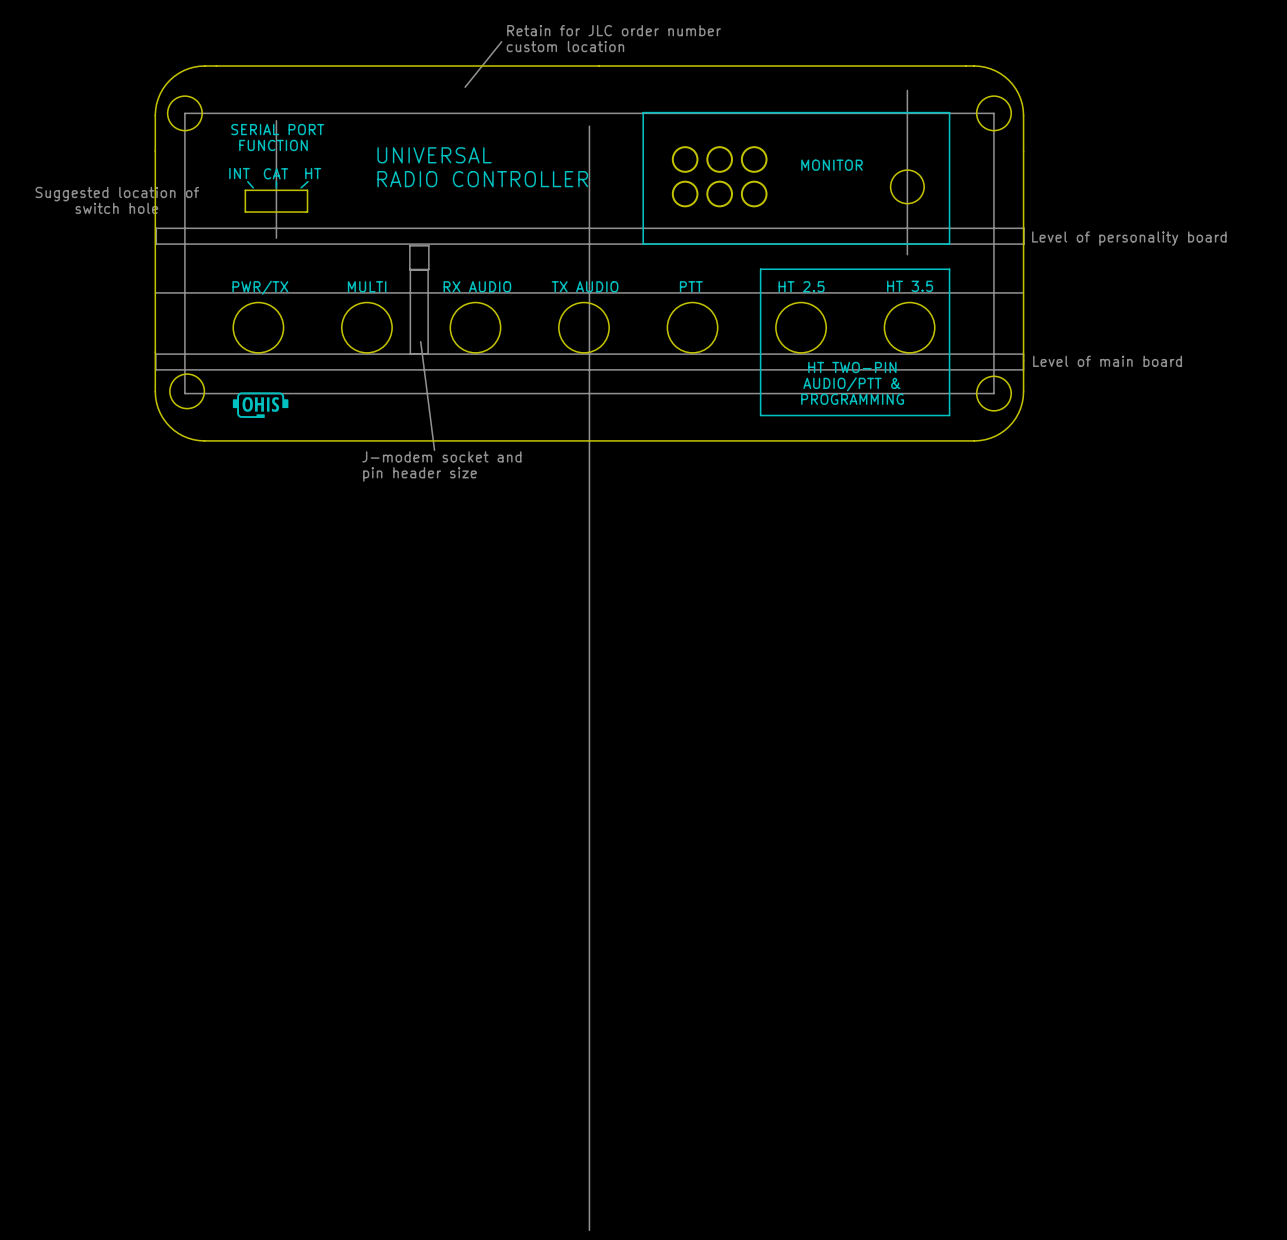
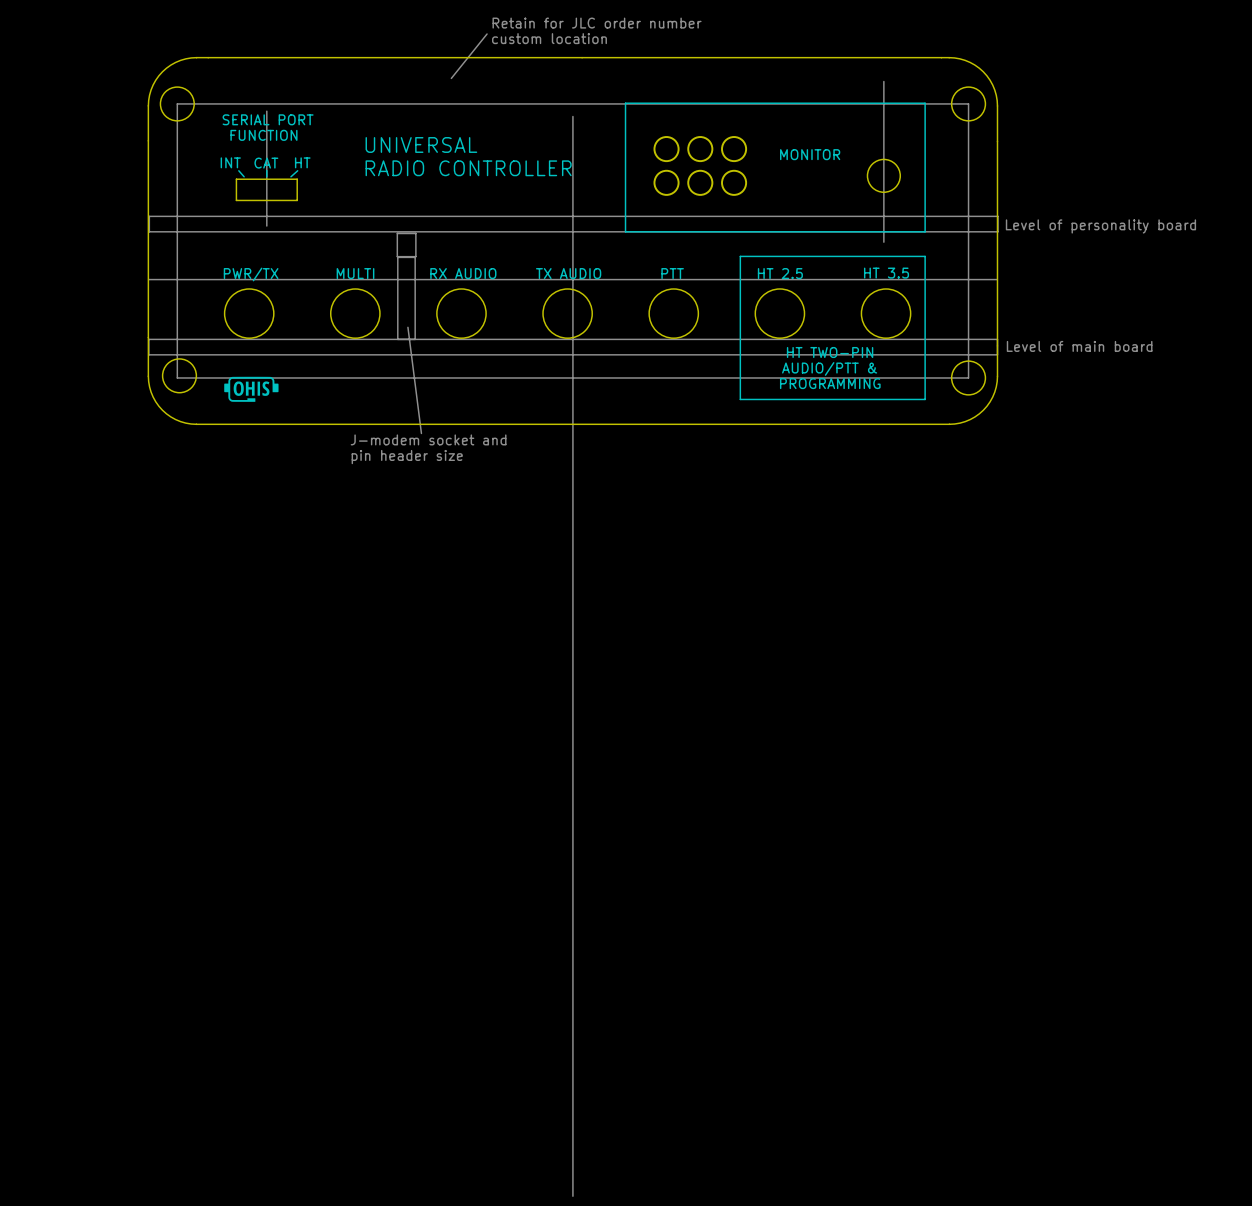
text: Suggested location of (117, 194) -> none
text: switch hole (116, 208) -> none

